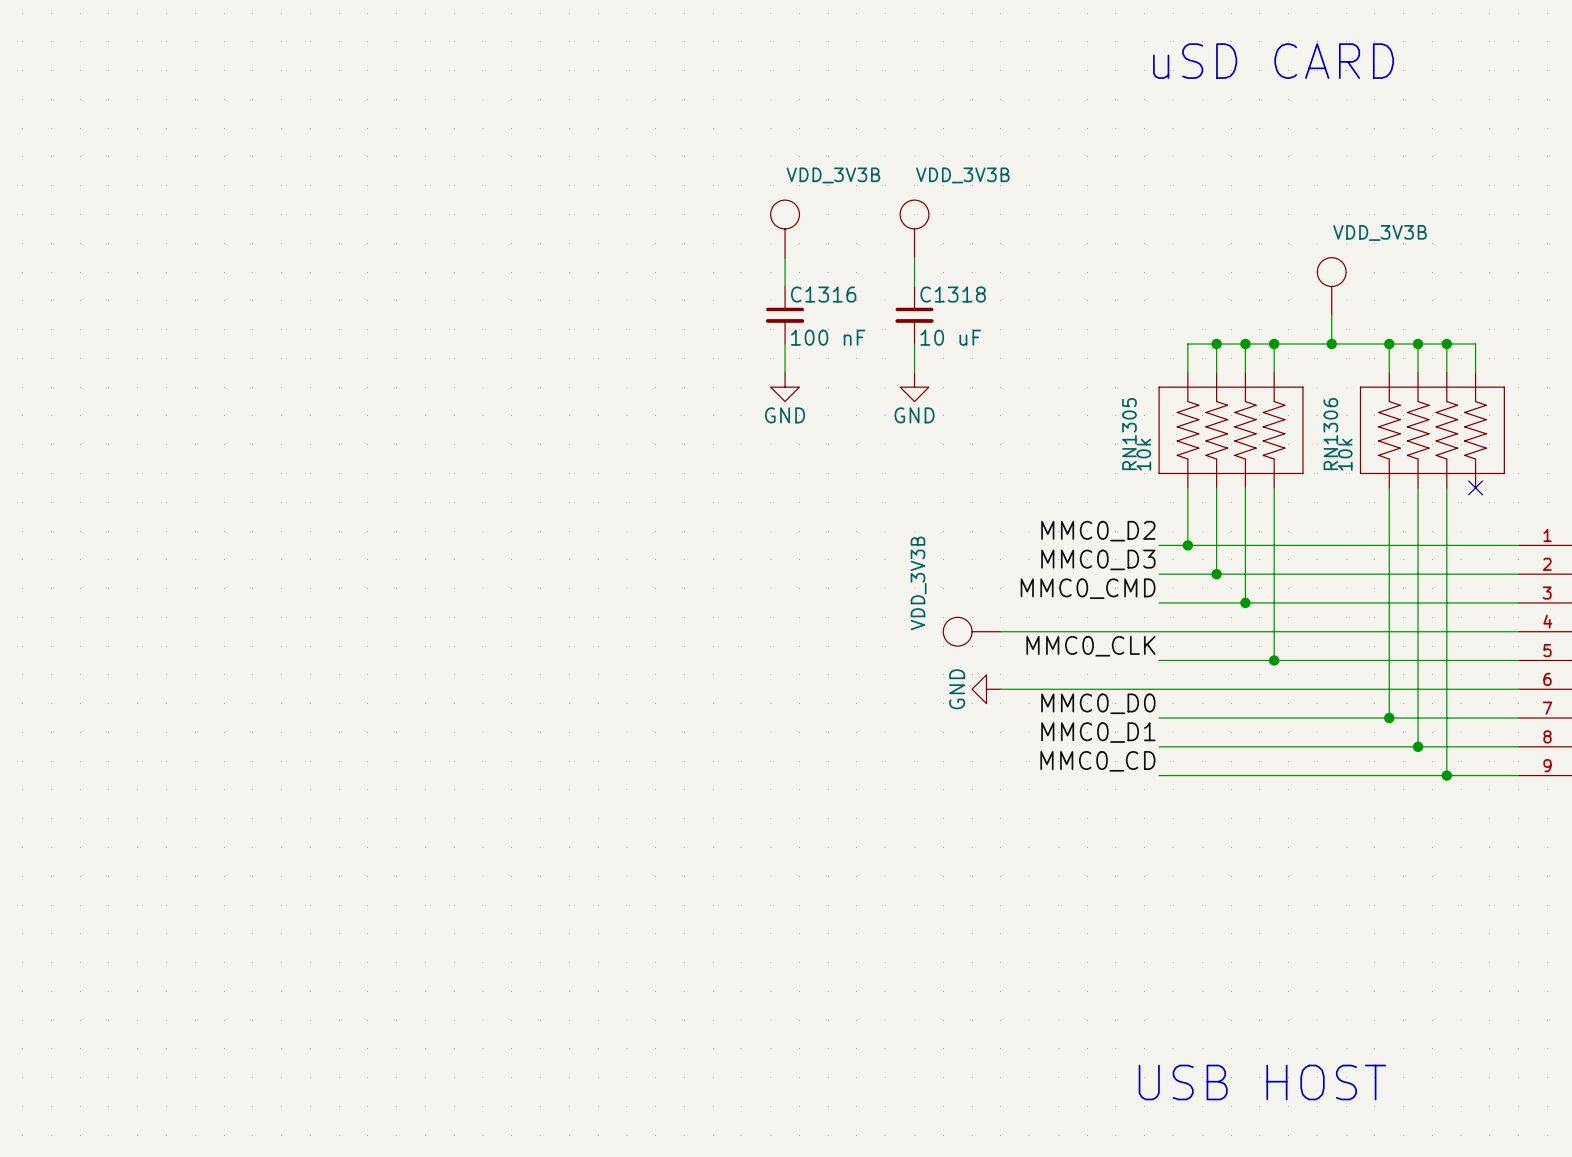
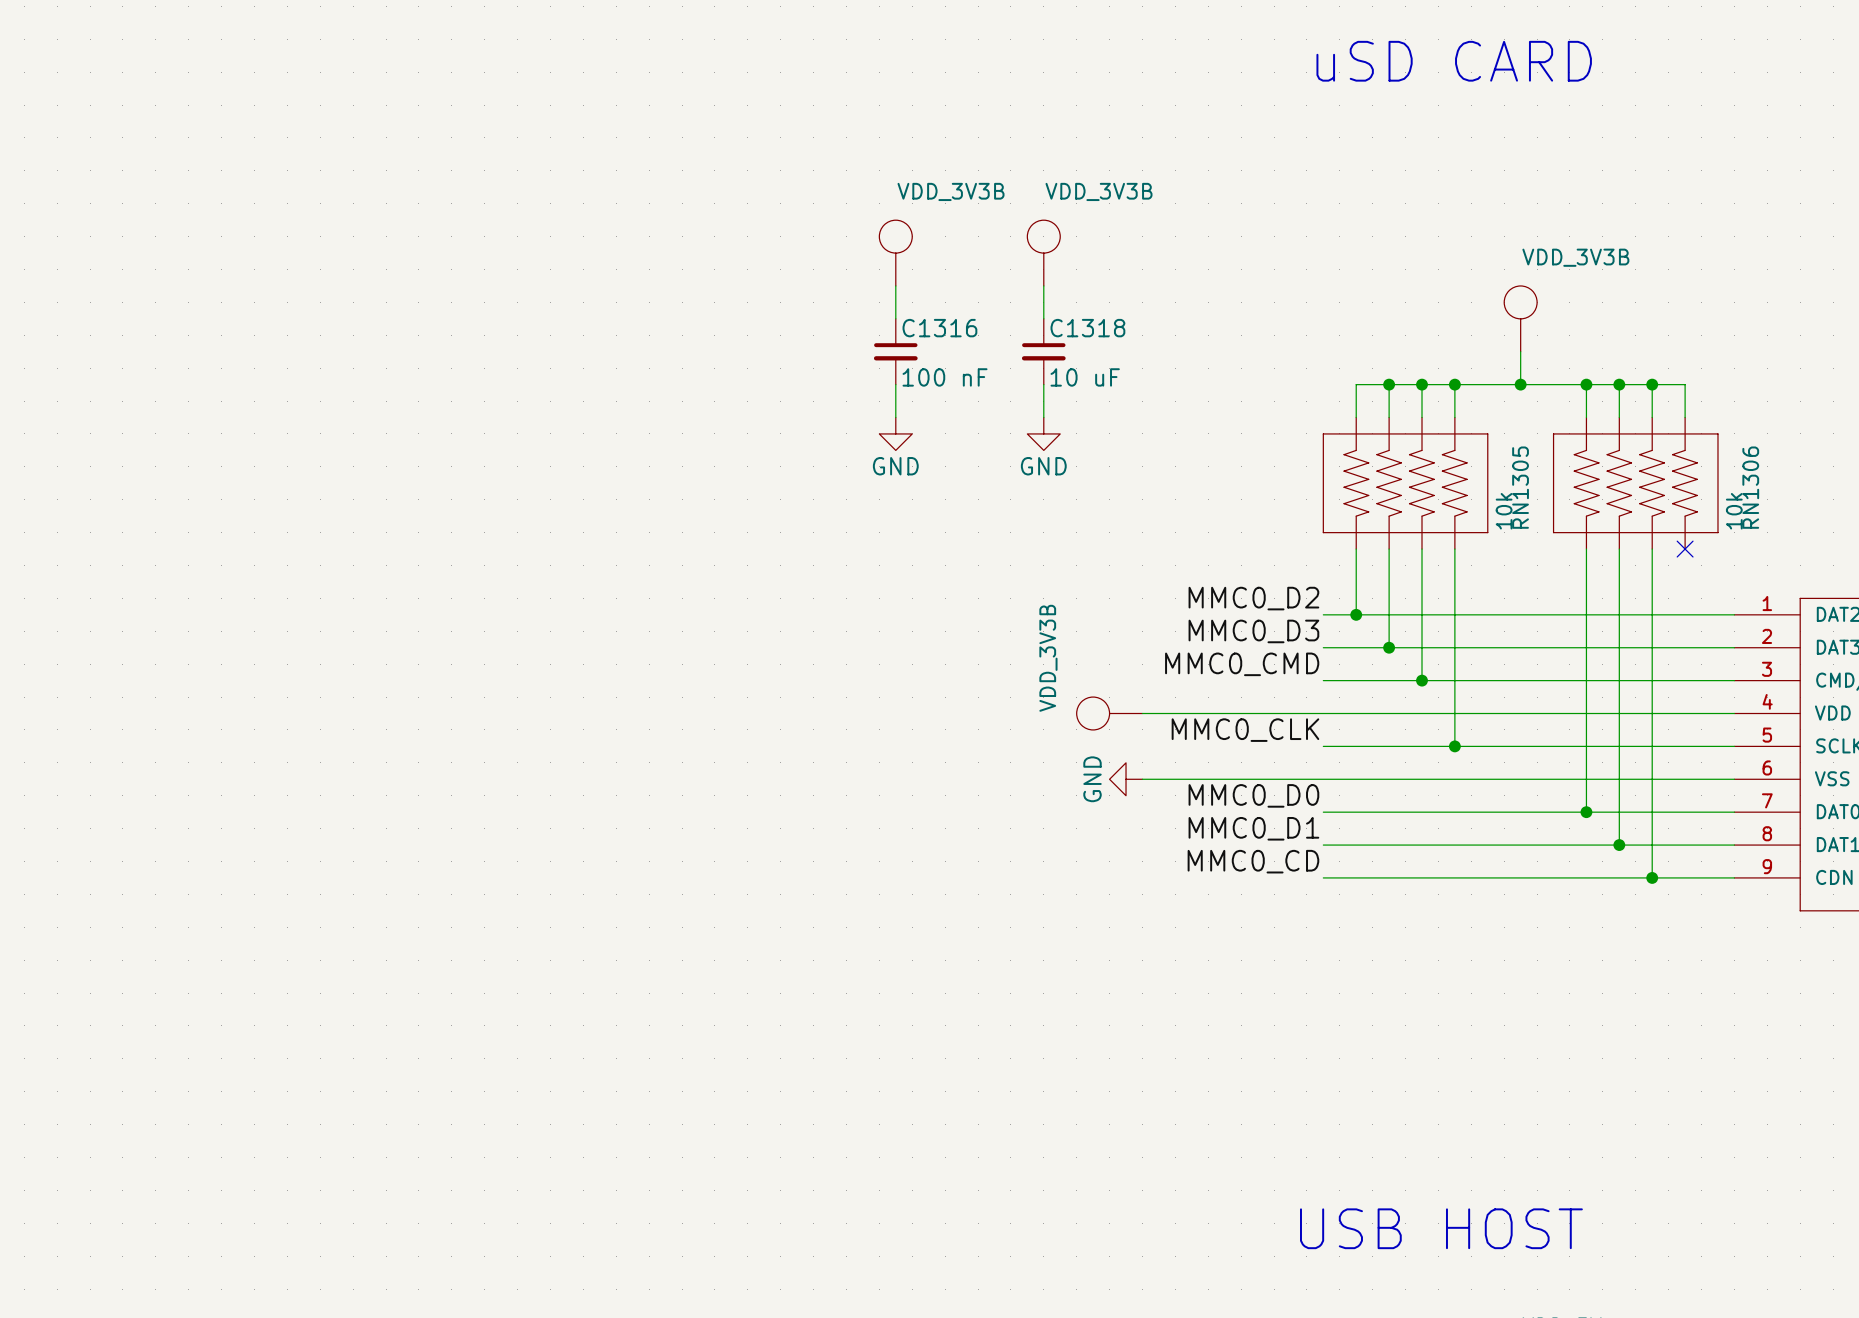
RN1305 flip: as is (1231, 430) -> left-right (1405, 483)
RN1306 flip: as is (1432, 430) -> left-right (1635, 483)

